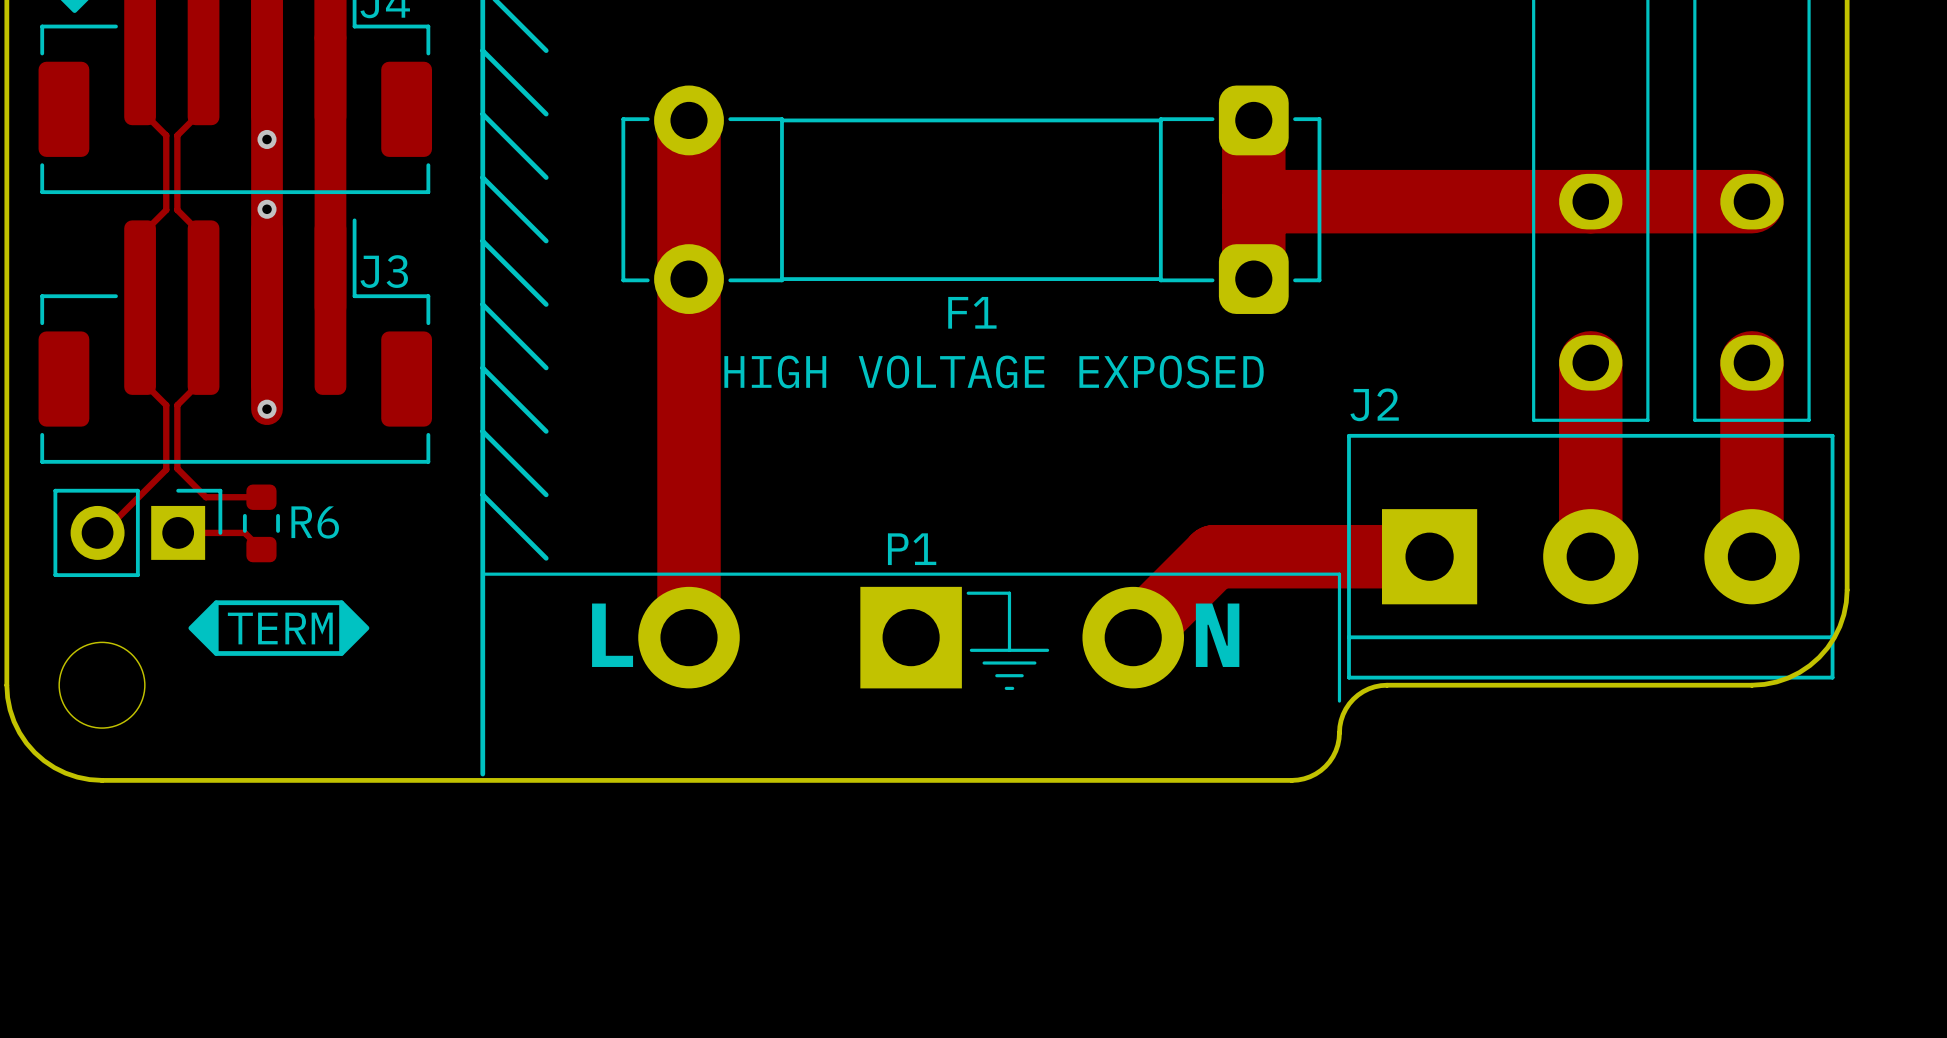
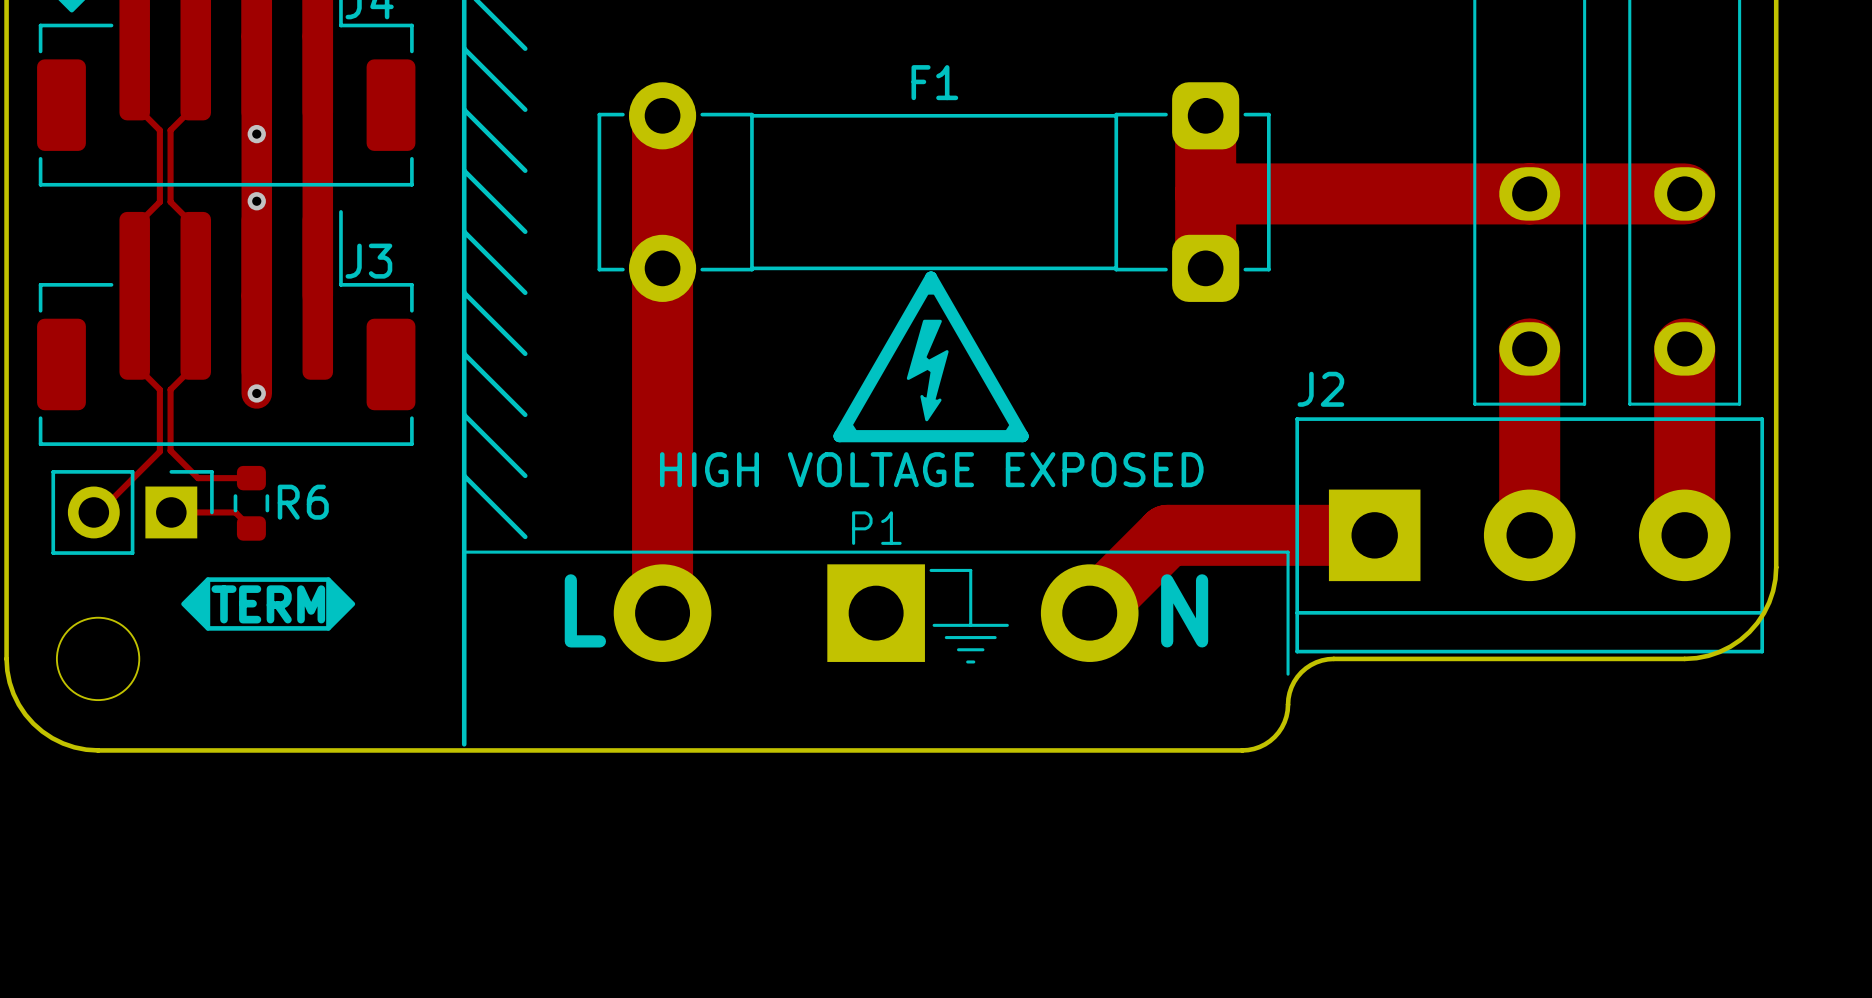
drawing: none -> [833, 271, 1029, 443]
F1 name position: F1 (972, 312) -> F1 (934, 82)
text position: HIGH VOLTAGE EXPOSED (994, 371) -> HIGH VOLTAGE EXPOSED (931, 469)

